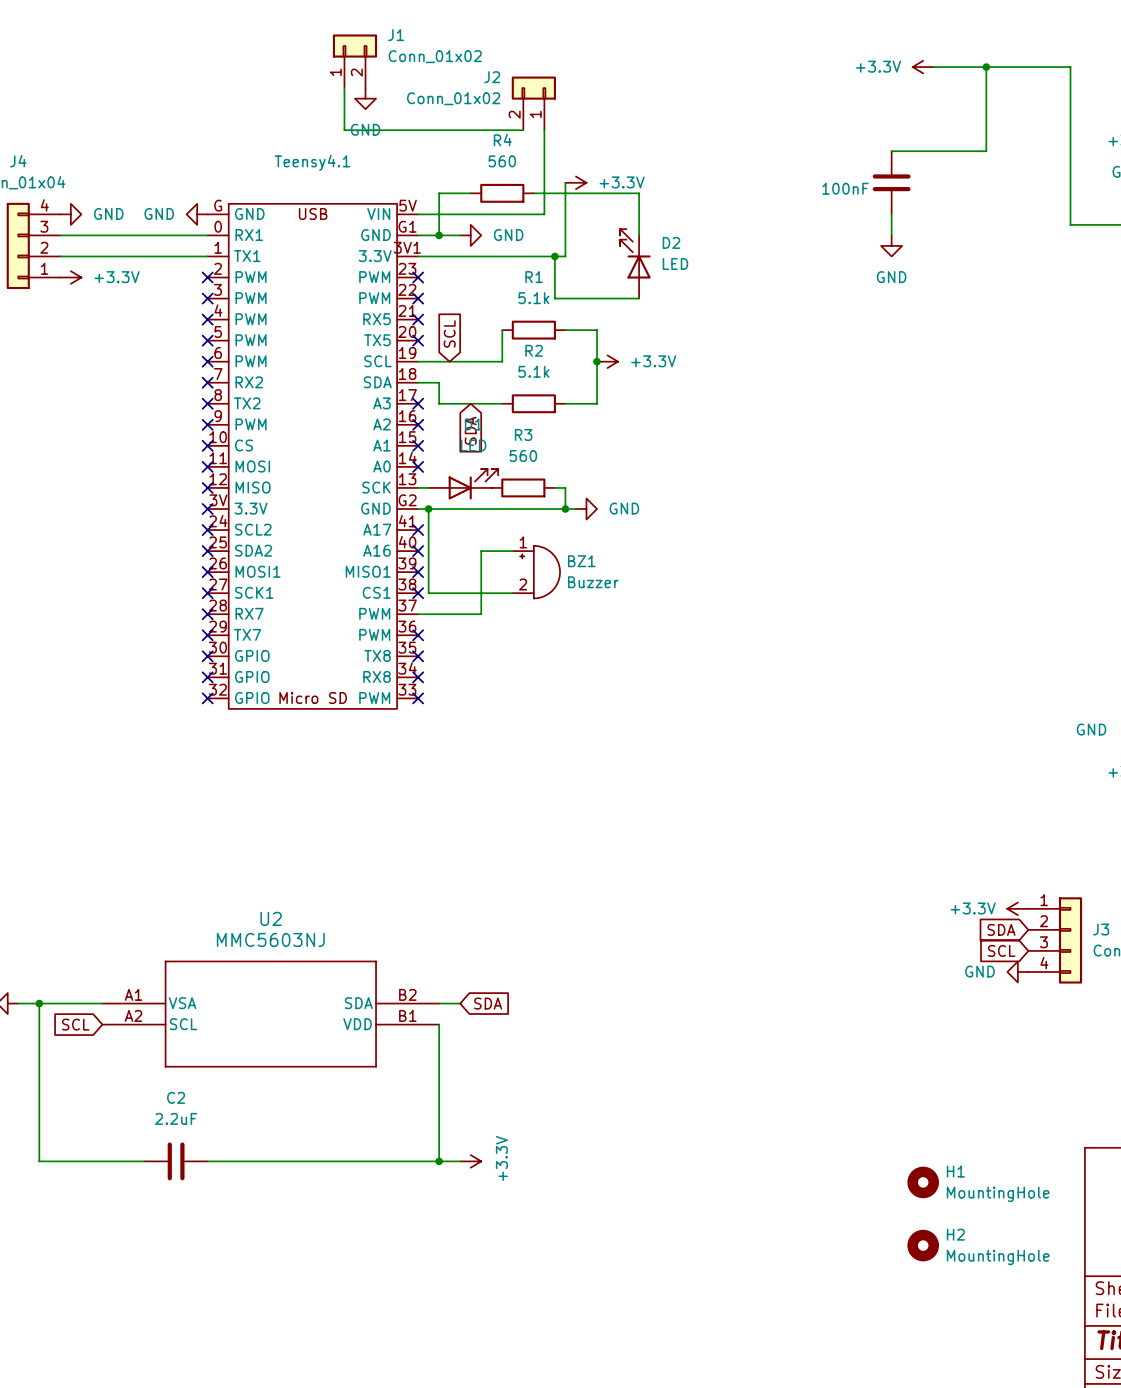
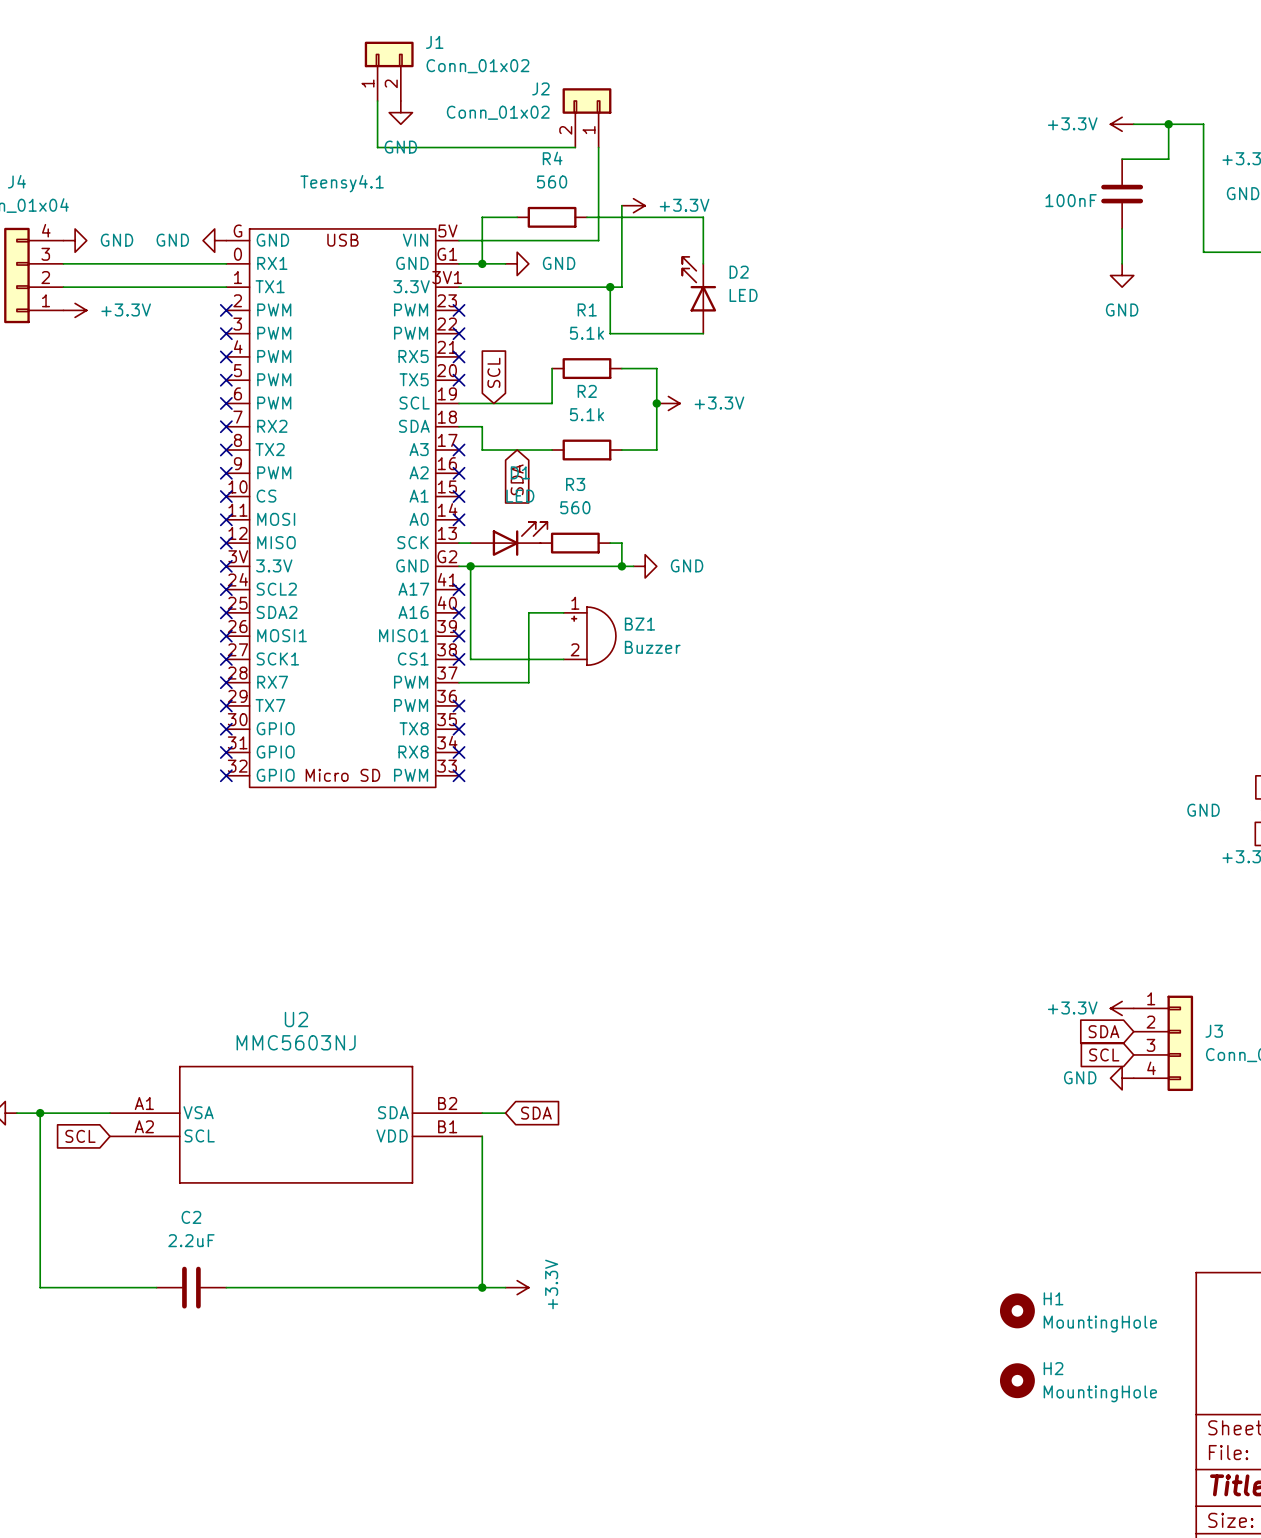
power symbol position: +3.3V (923, 67) -> +3.3V (1122, 124)
wire: (933, 67) (1070, 67) (1070, 224) (1091, 224) -> (1133, 124) (1203, 124) (1203, 252)
wire: (986, 67) (986, 151) (891, 151) -> none
junction: (986, 67) -> none
wire: none -> (1168, 124) (1168, 159) (1122, 159)
junction: none -> (1168, 124)
part position: (891, 182) -> (1122, 194)
wire: none -> (1122, 228) (1122, 263)
wire: (891, 214) (891, 235) -> none
power symbol position: GND (891, 245) -> GND (1122, 275)

